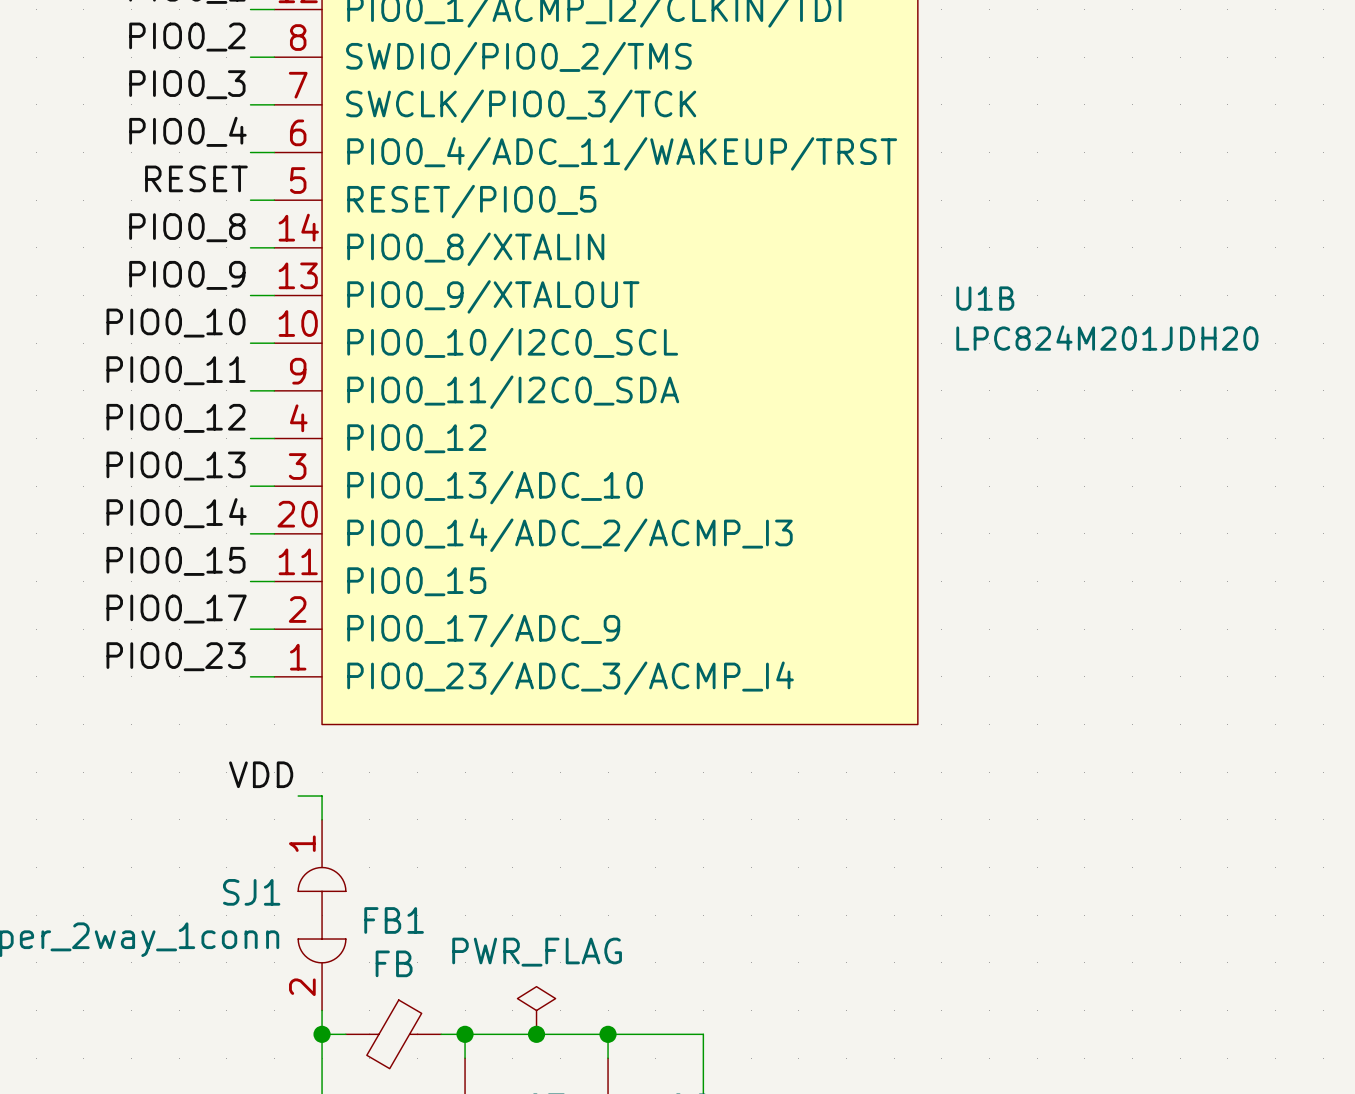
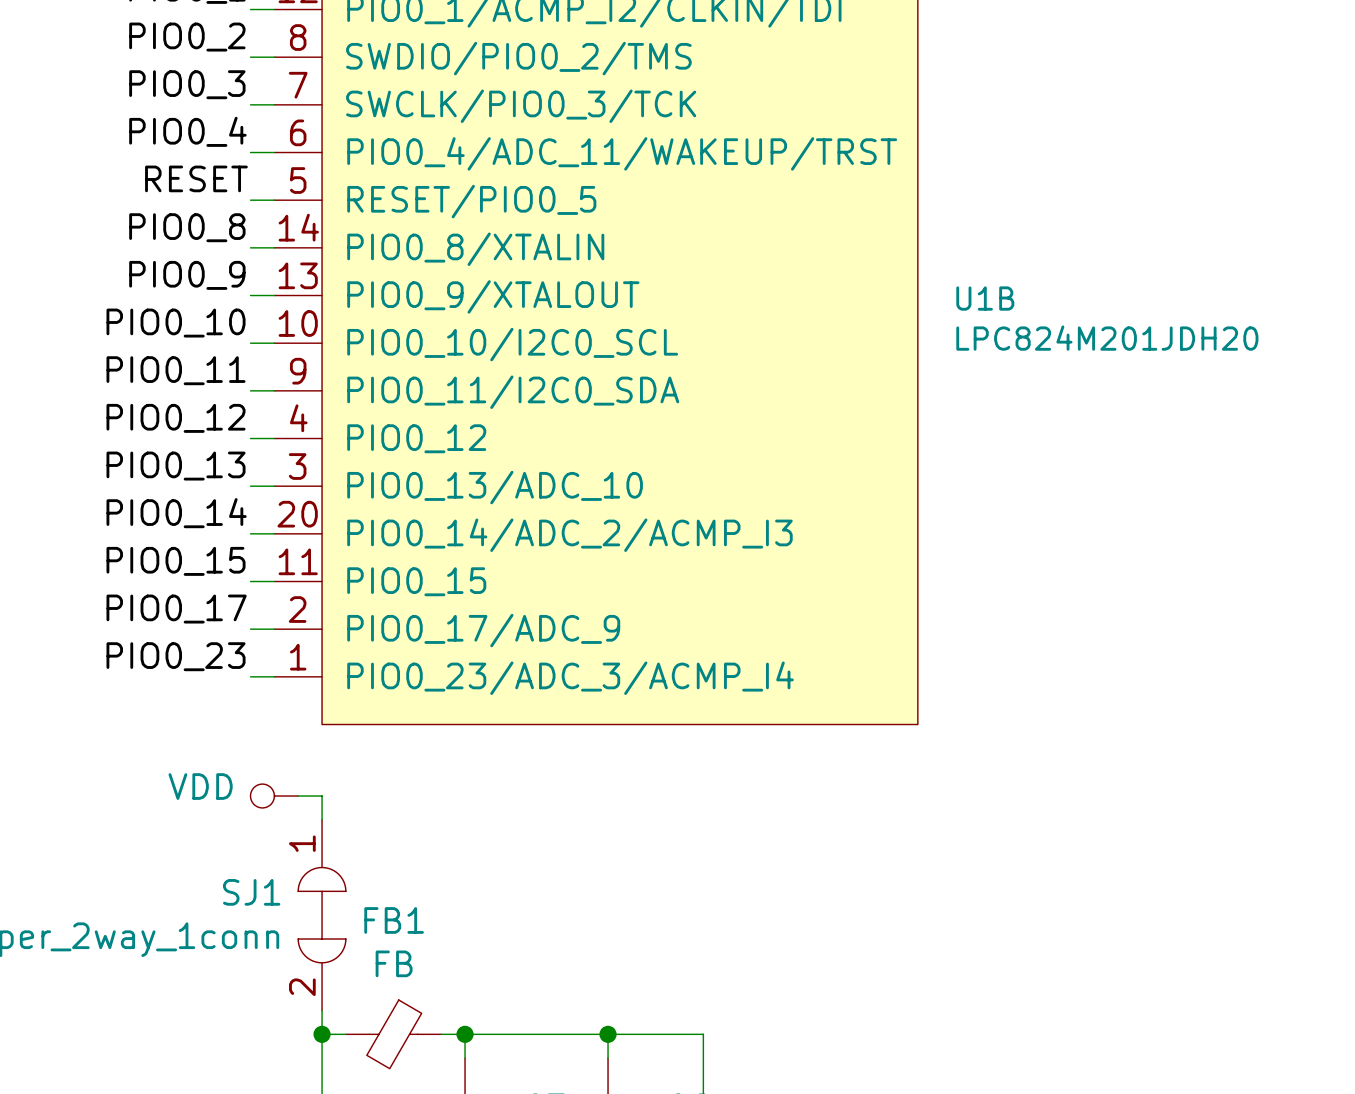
label: VDD (261, 774) -> none
power symbol: none -> VDD (274, 796)
power symbol: PWR_FLAG (536, 1010) -> none
junction: (536, 1034) -> none

